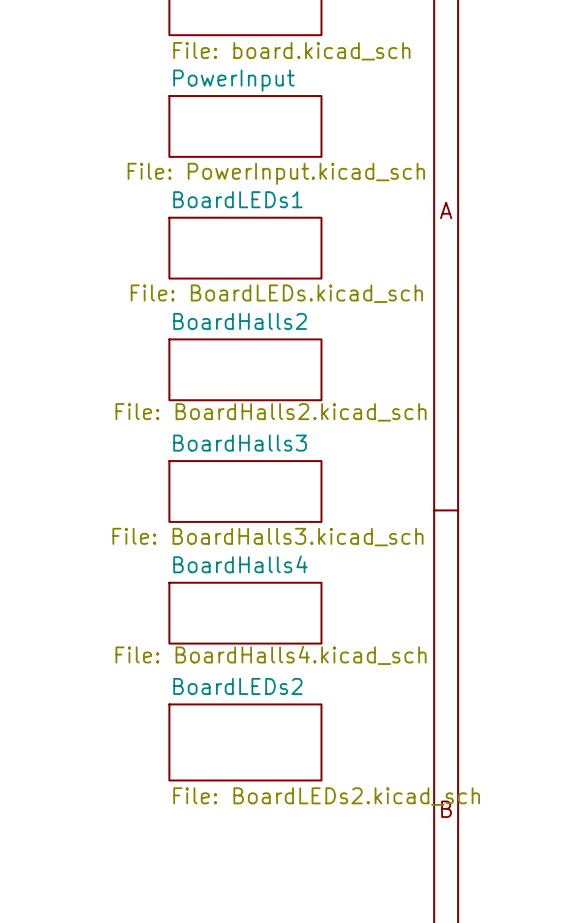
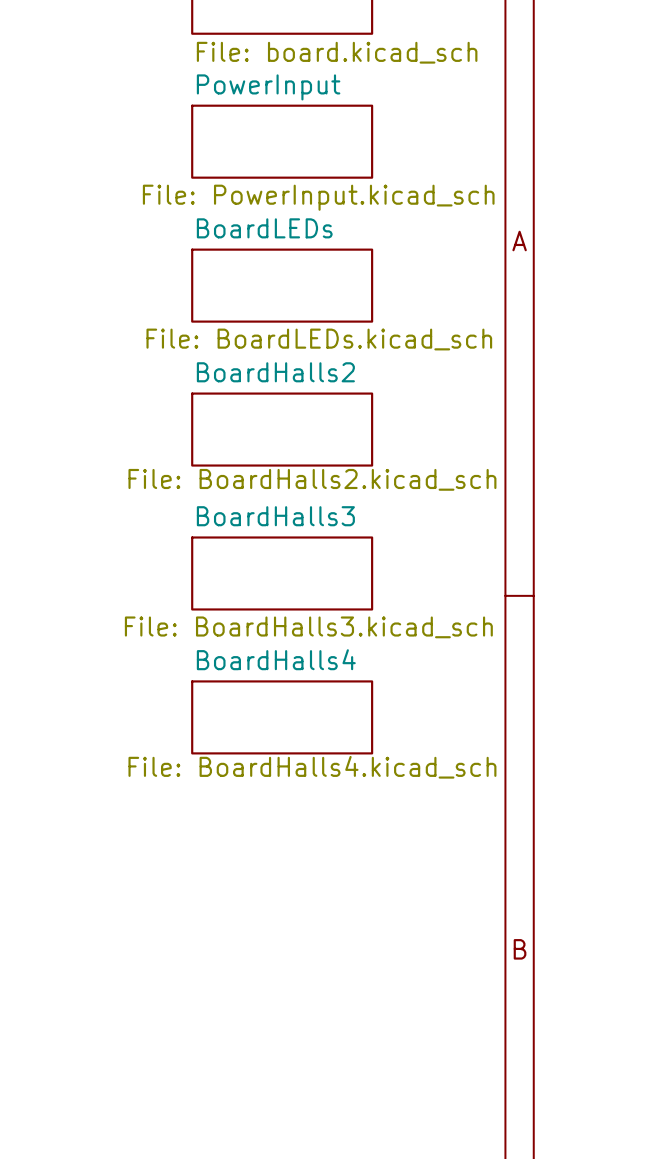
sheet BoardLEDs1 name: BoardLEDs1 (237, 199) -> BoardLEDs (264, 228)
sheet BoardLEDs2: File: BoardLEDs2.kicad_sch (245, 742) -> none

